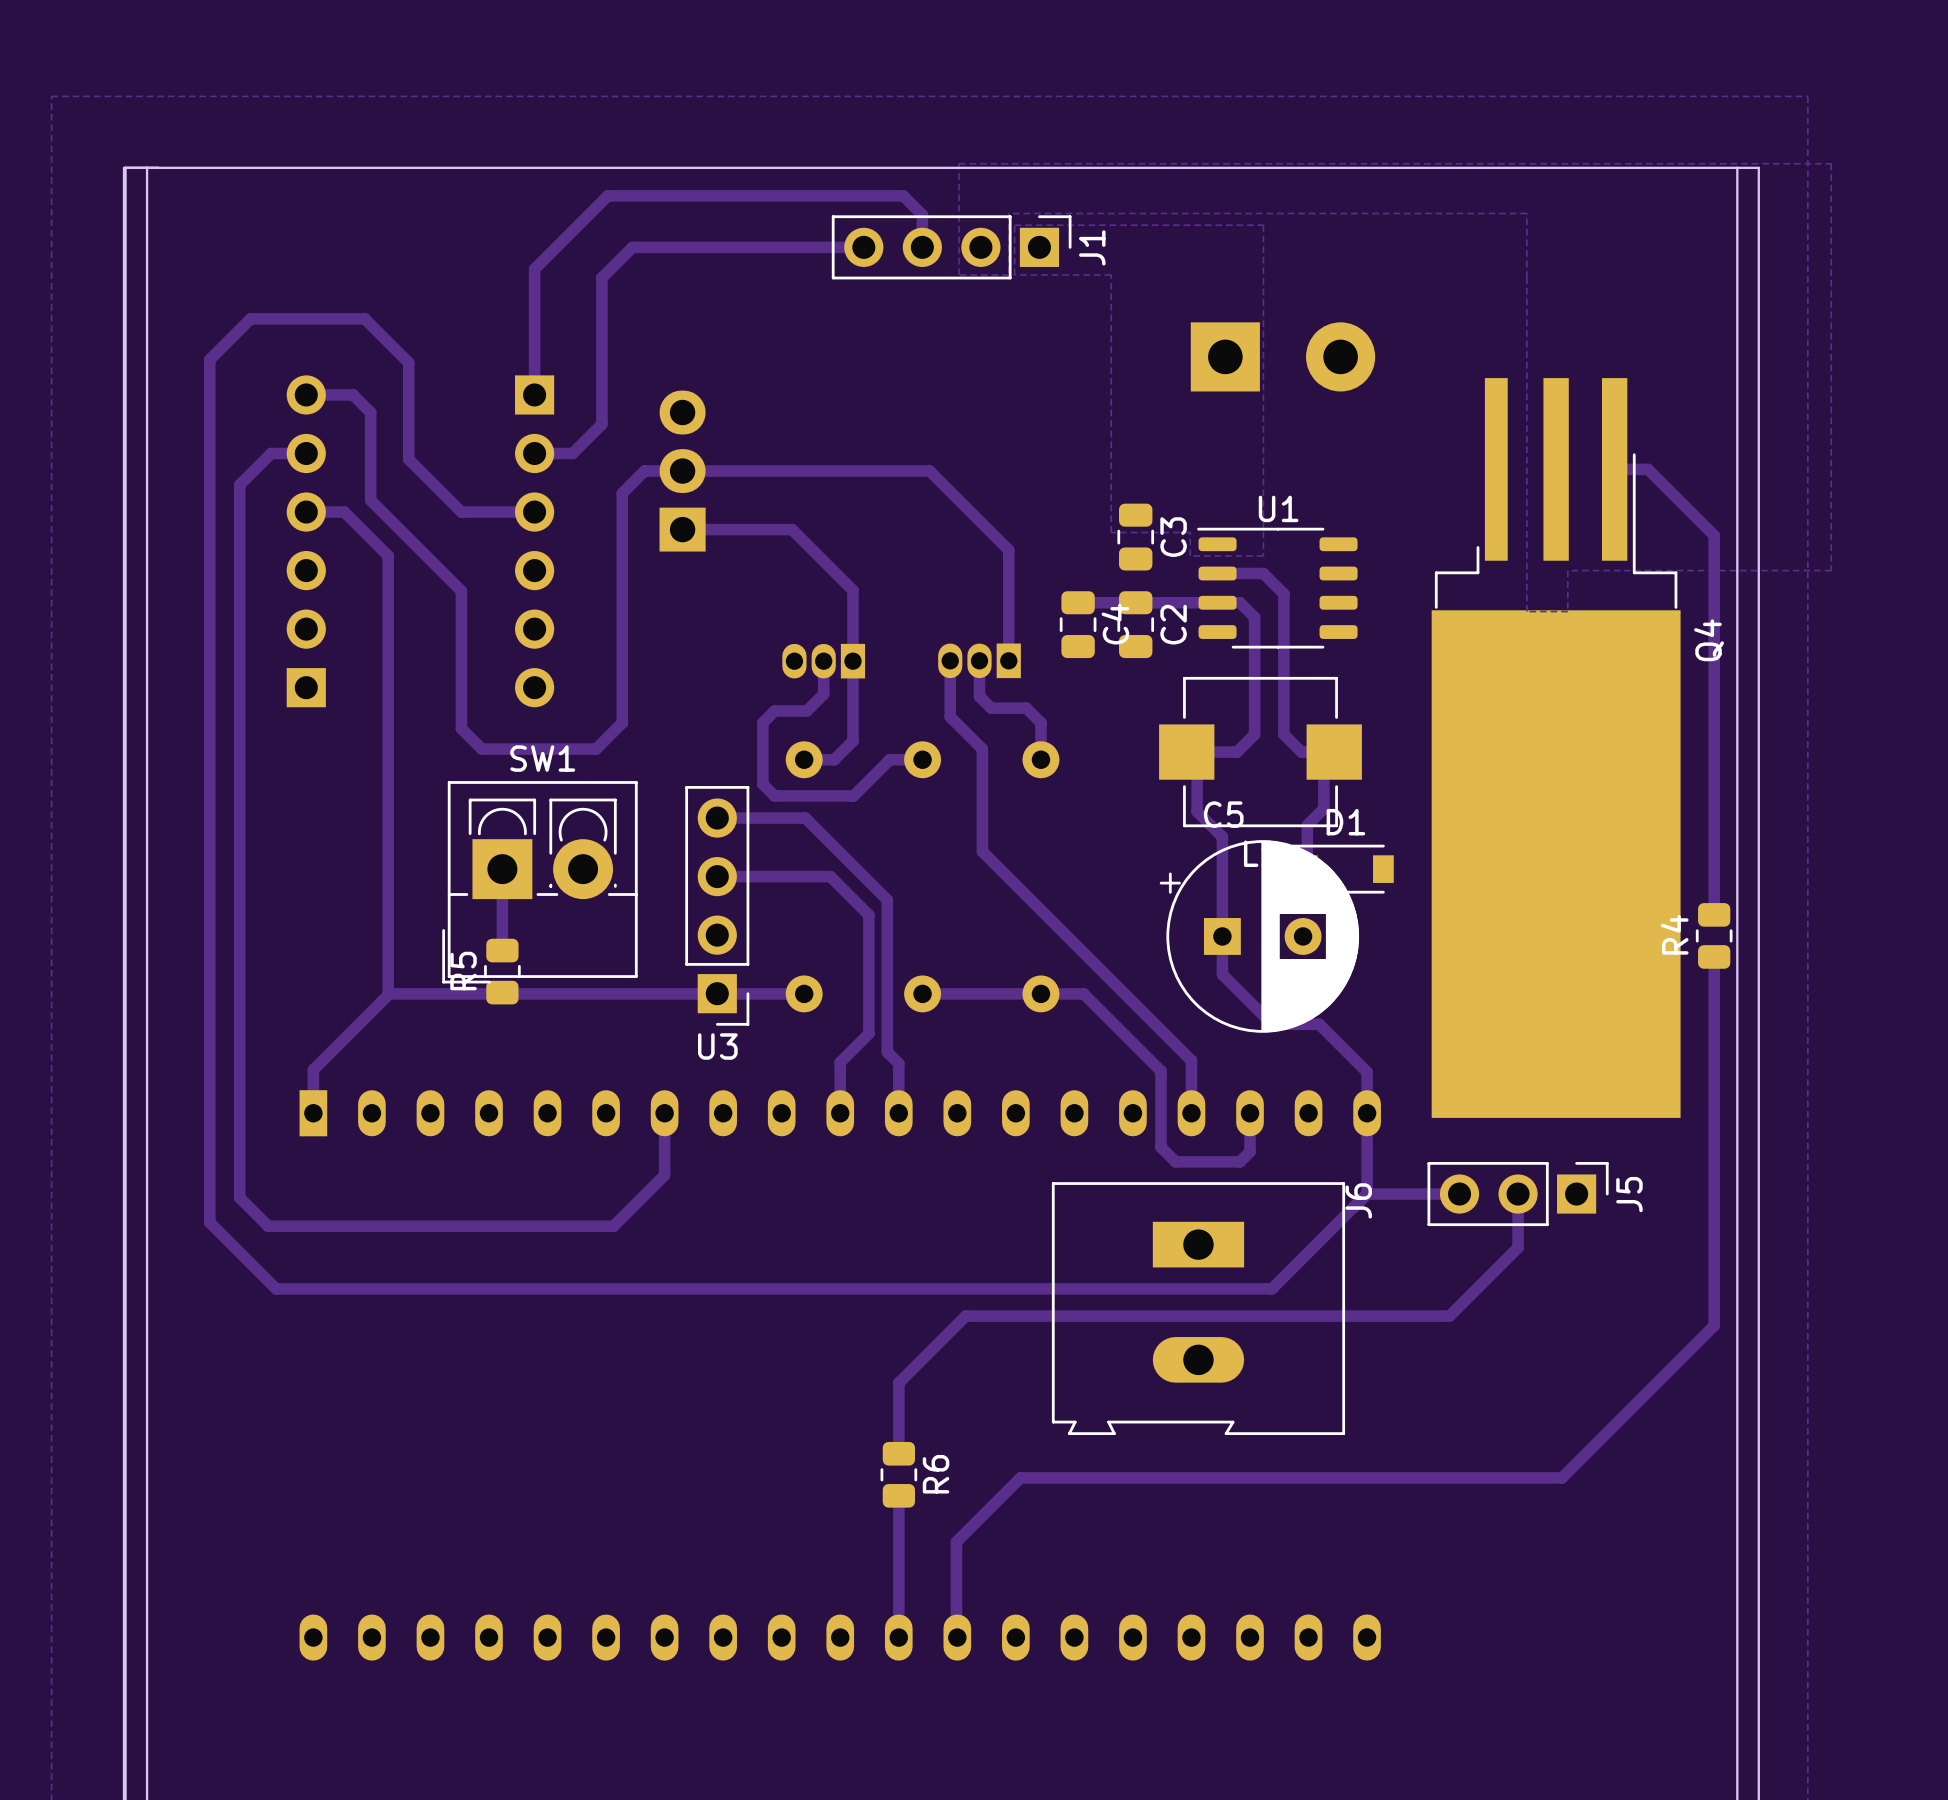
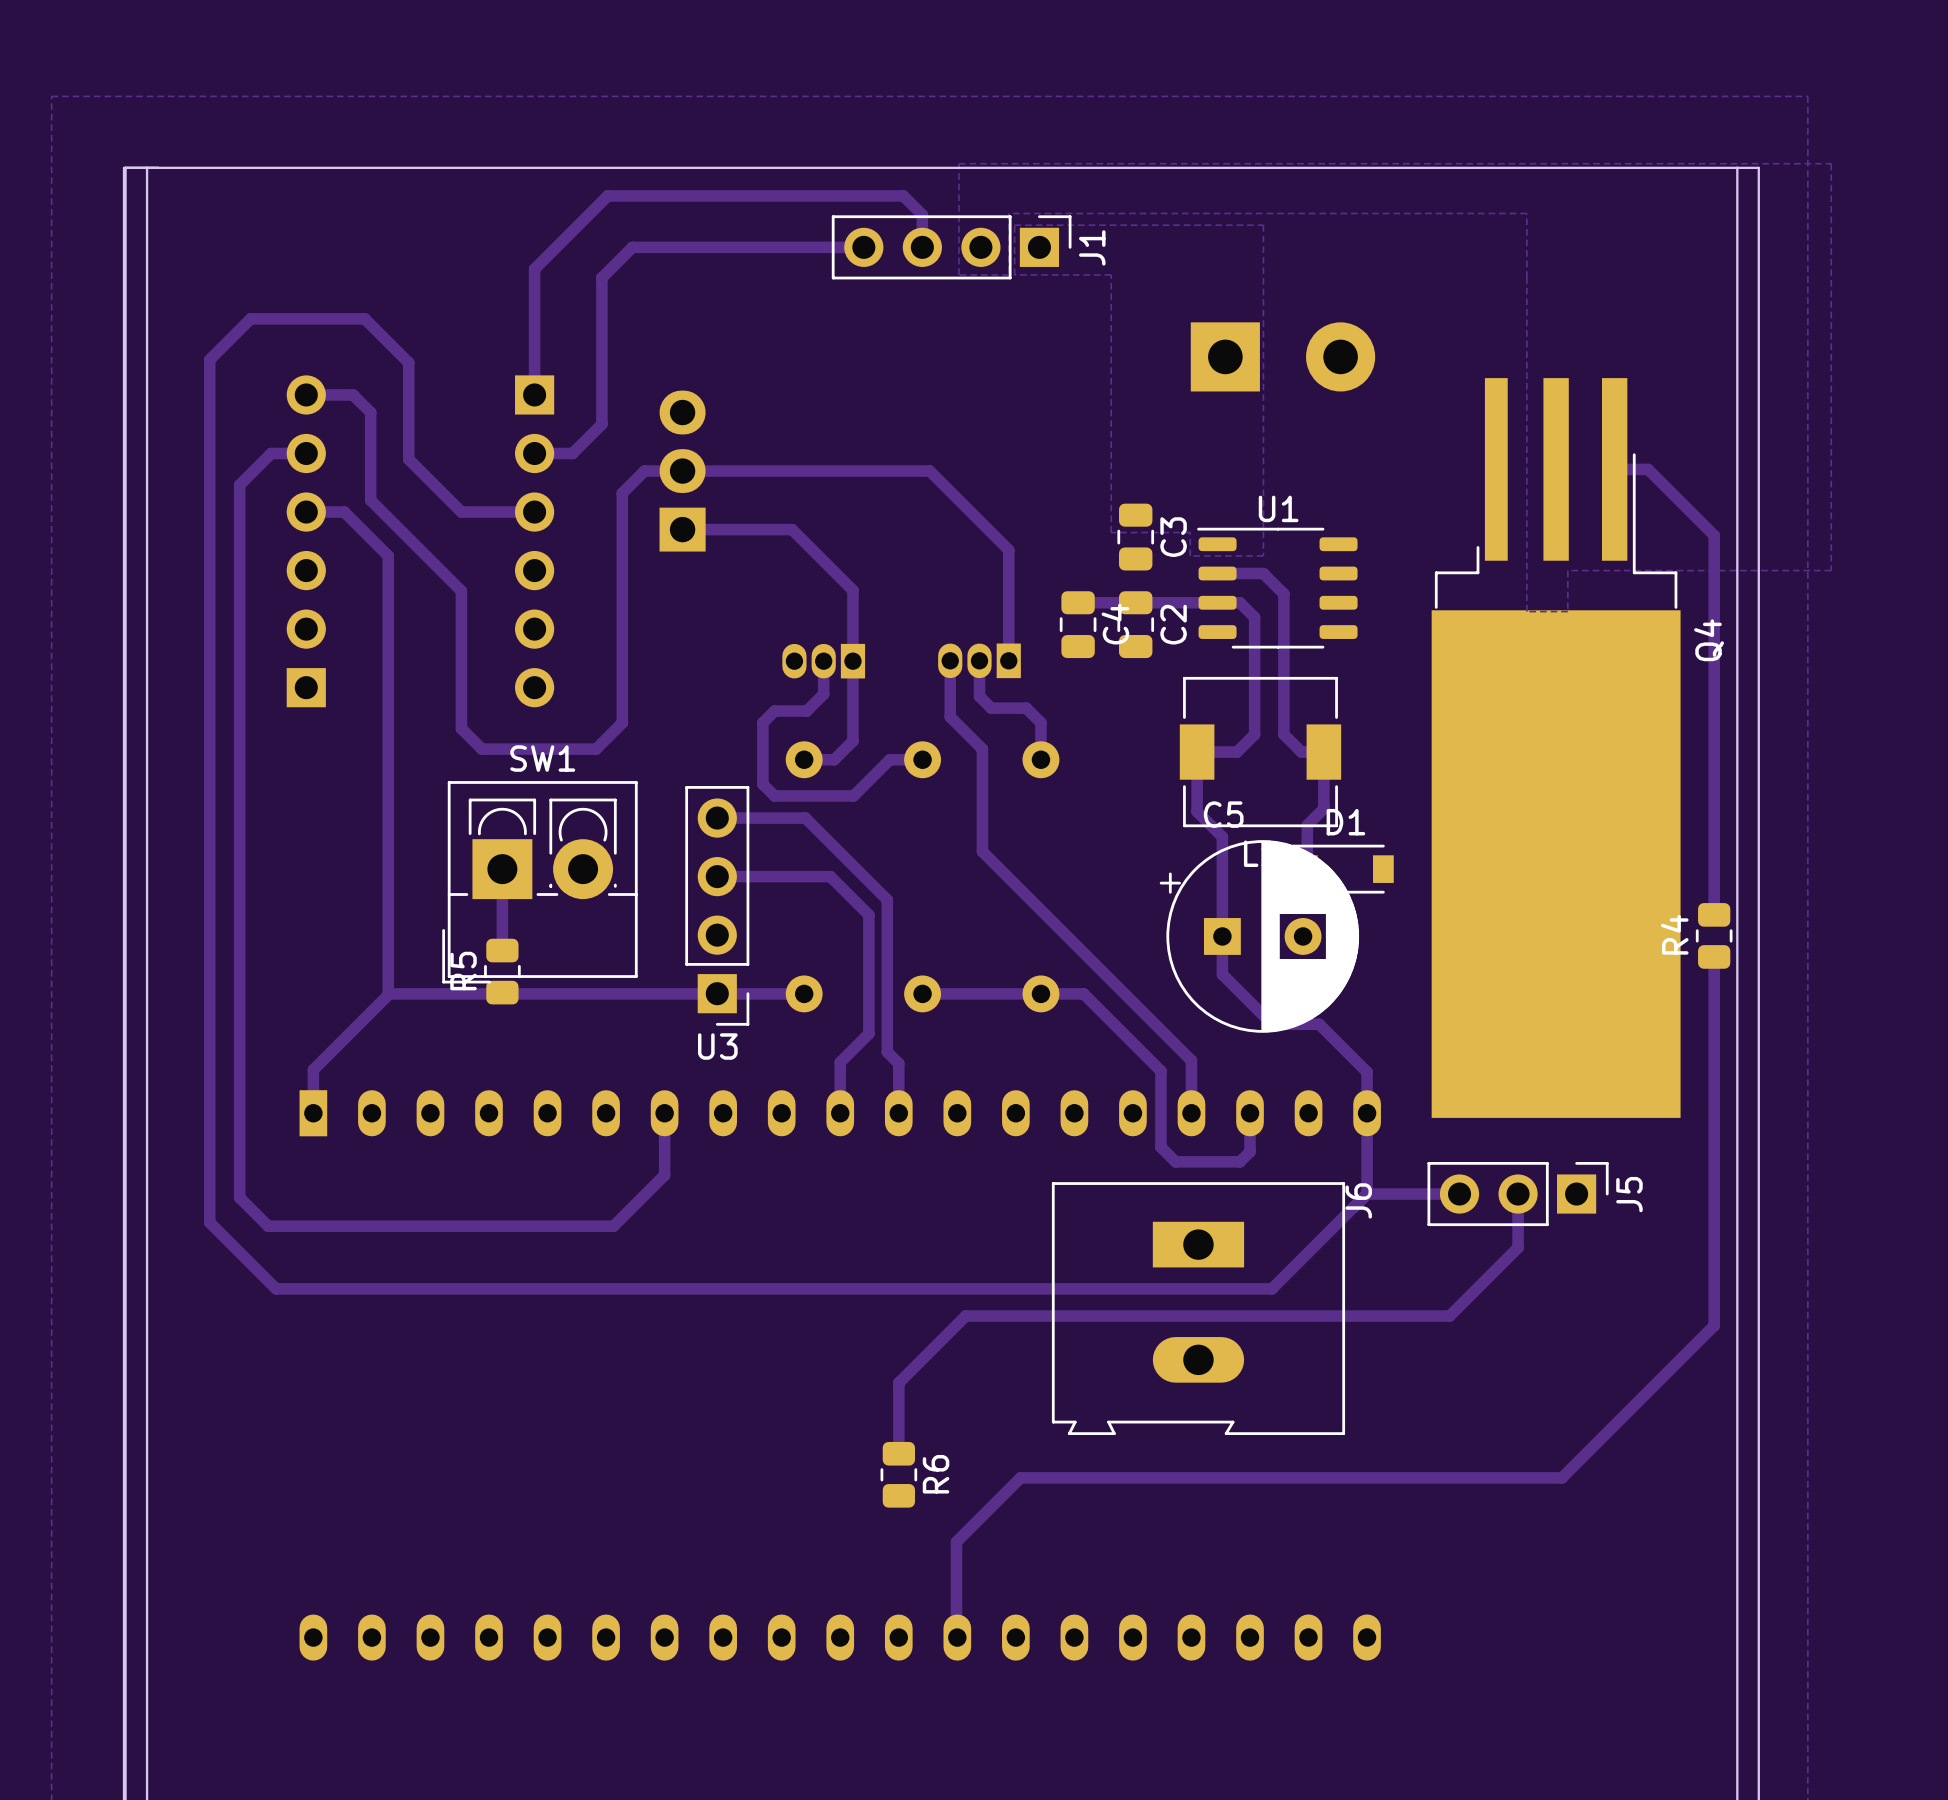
part footprint: [1159, 676, 1362, 828] -> [1179, 676, 1342, 828]
track: (898, 1495) (898, 1637) -> none

